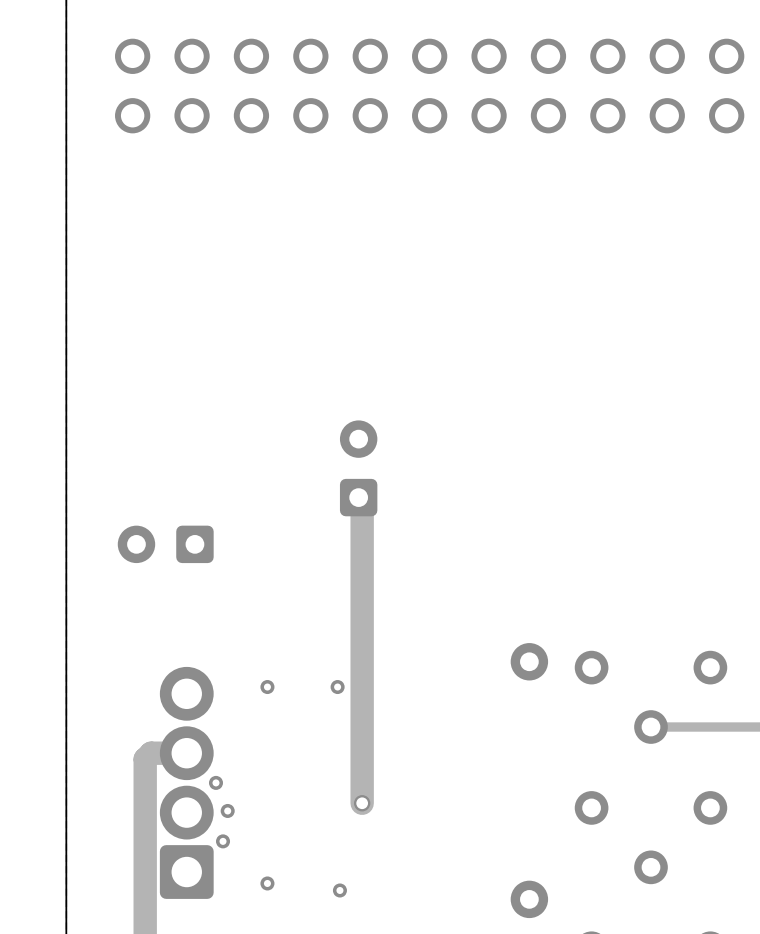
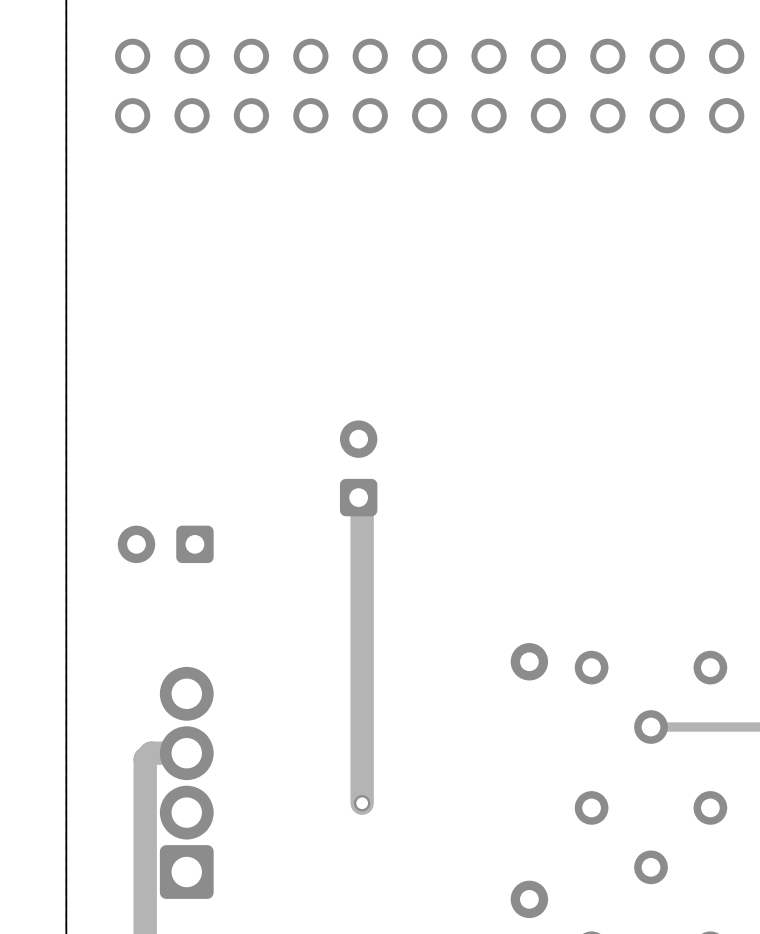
via: (267, 687) -> none
via: (337, 687) -> none
via: (215, 782) -> none
via: (227, 810) -> none
via: (223, 841) -> none
via: (267, 883) -> none
via: (339, 890) -> none

